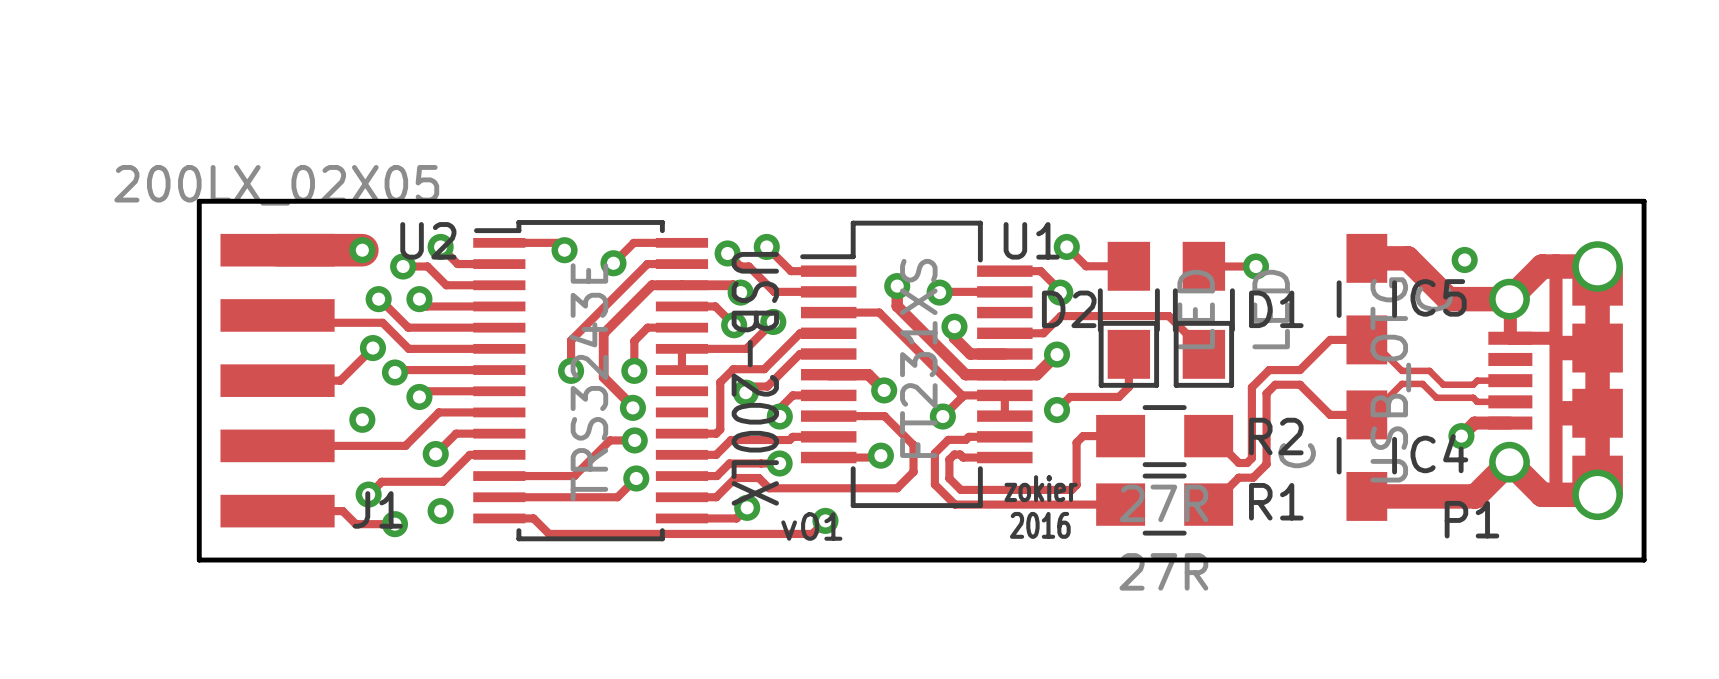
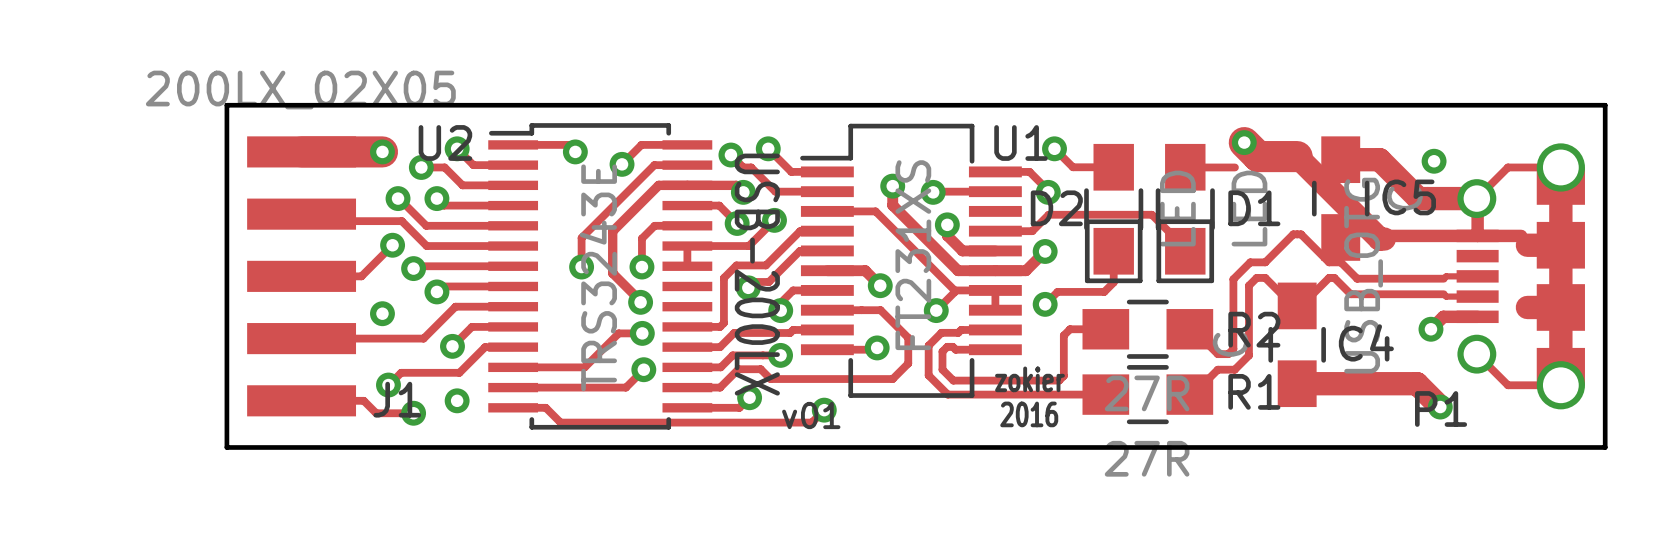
track: none -> (1244, 142) (1258, 156) (1297, 156) (1379, 239) (1384, 239) (1387, 235) (1477, 235)
via position: (1255, 266) -> (1244, 142)
track: (1556, 266) (1556, 494) -> none
track width: thick (1597, 266) (1542, 266) (1509, 299) -> thin (1560, 167) (1507, 167) (1476, 198)
track: (1474, 383) (1473, 384) (1443, 384) (1429, 370) (1401, 370) (1370, 339) (1330, 339) (1299, 370) (1269, 370) (1251, 387) (1251, 458) (1247, 463) (1238, 462) -> (1443, 278) (1357, 278) (1340, 262) (1329, 262) (1301, 234) (1293, 234) (1265, 262) (1250, 262) (1233, 279) (1233, 349) (1228, 354) (1217, 354)
track: (1474, 399) (1473, 397) (1436, 397) (1422, 383) (1401, 383) (1370, 414) (1330, 414) (1299, 384) (1275, 384) (1266, 393) (1266, 464) (1253, 477) (1238, 478) -> (1443, 294) (1350, 294) (1334, 277) (1329, 277) (1301, 305) (1293, 305) (1265, 277) (1256, 277) (1248, 285) (1248, 355) (1234, 369) (1217, 369)
C4 position: (1366, 455) -> (1297, 344)
track: (1509, 462) (1475, 496) (1366, 496) -> none
track width: thick (1509, 462) (1542, 494) (1597, 494) -> thin (1476, 354) (1507, 385) (1560, 385)
track: none -> (1297, 383) (1416, 383) (1440, 407)
via: none -> (1440, 407)

